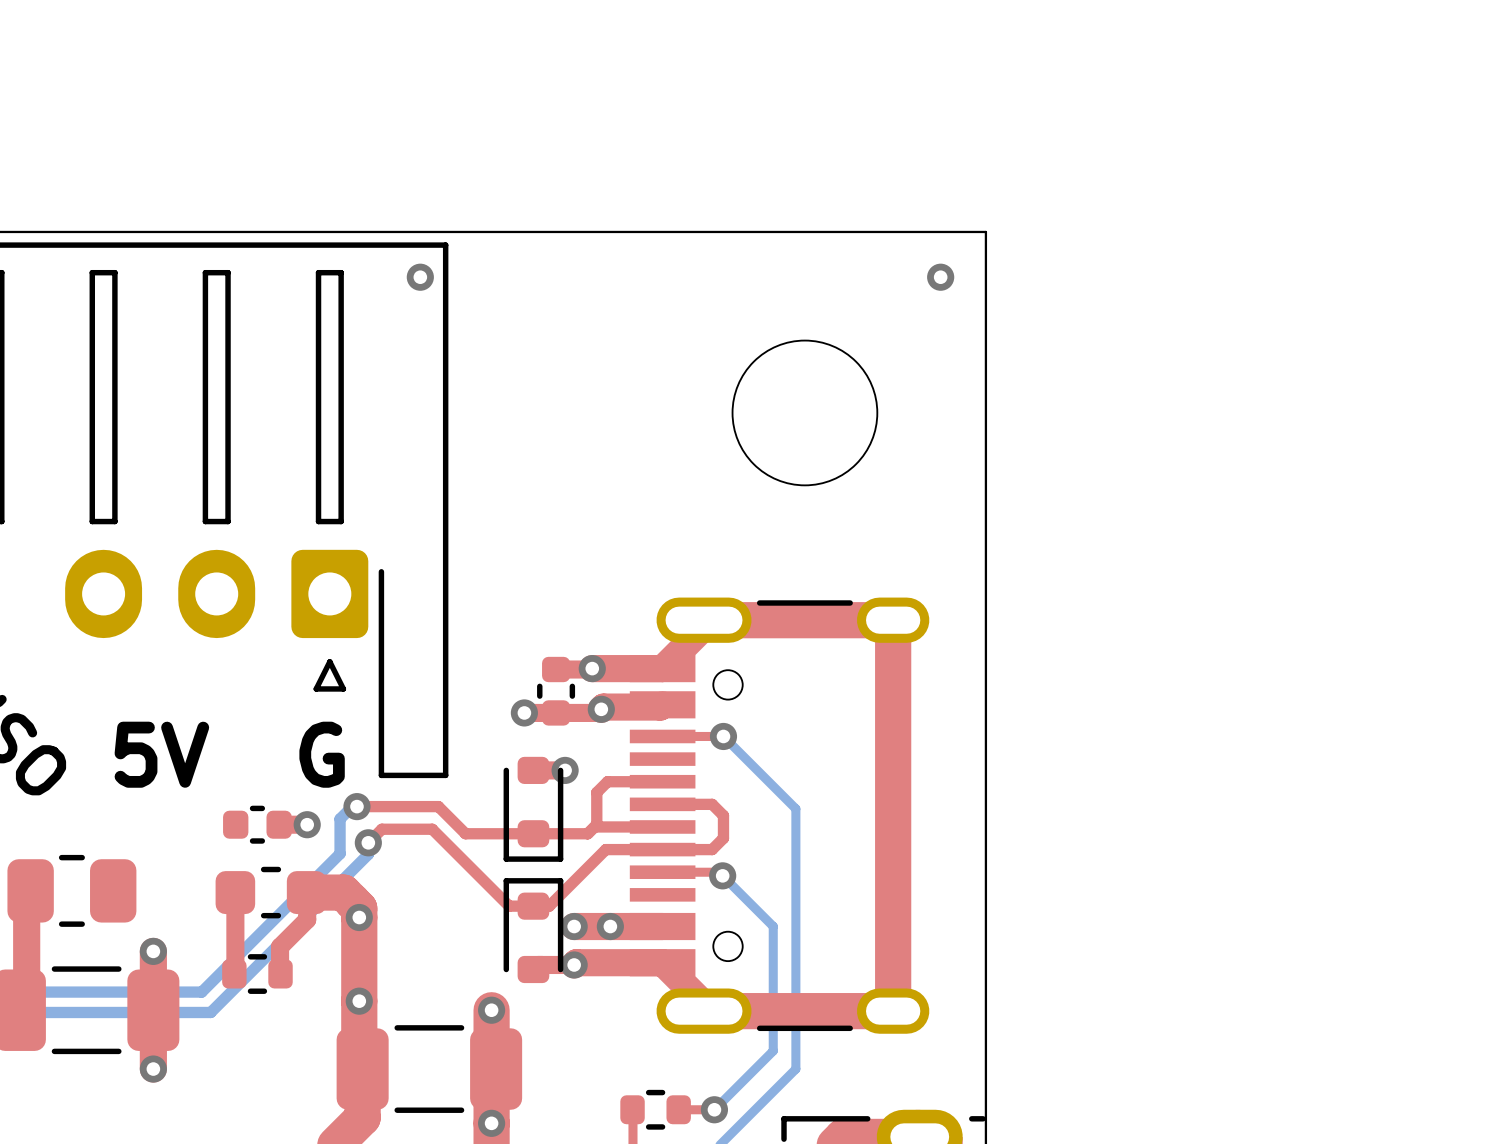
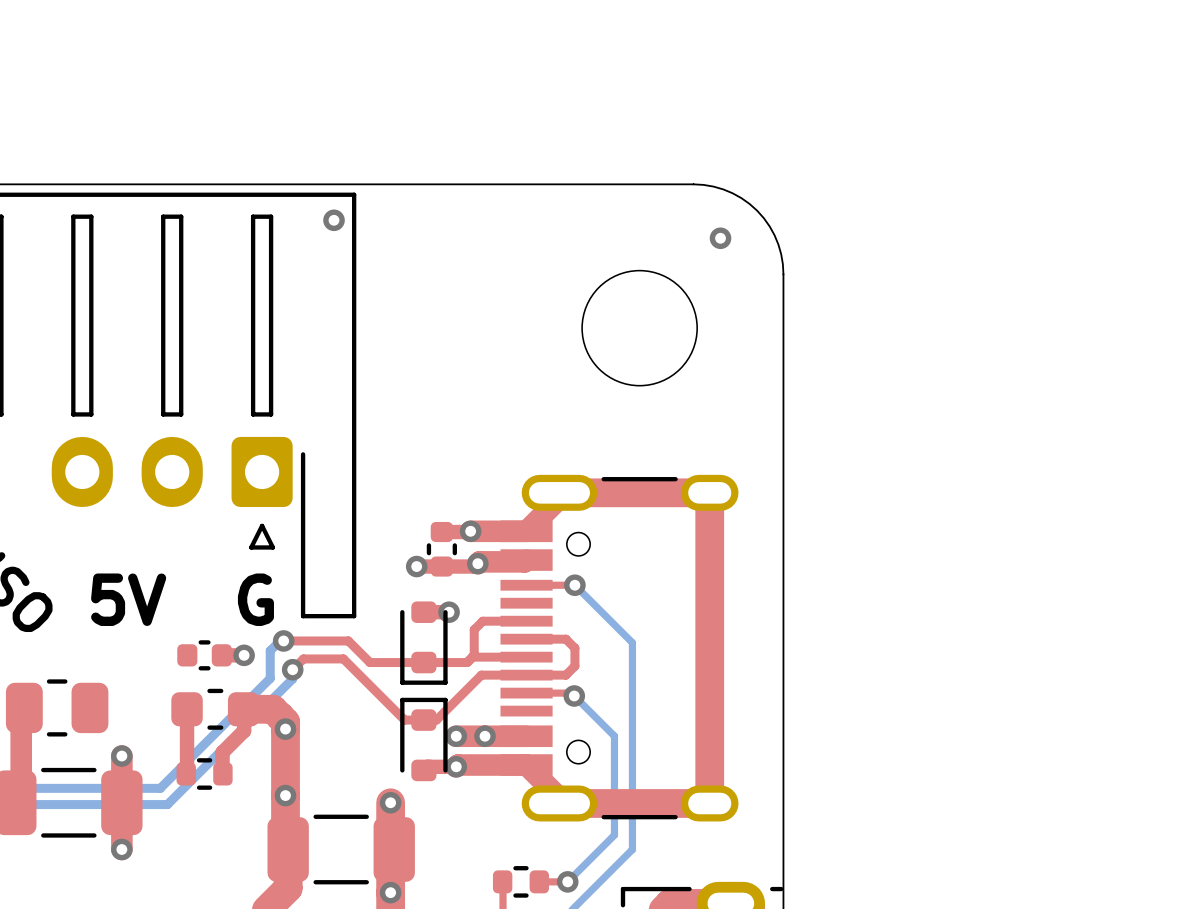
board edge: (872, 231) (985, 231) (985, 345) -> (693, 184) (723, 189) (741, 198) (757, 210) (774, 235) (781, 254) (783, 274)
via position: (940, 277) -> (720, 238)

